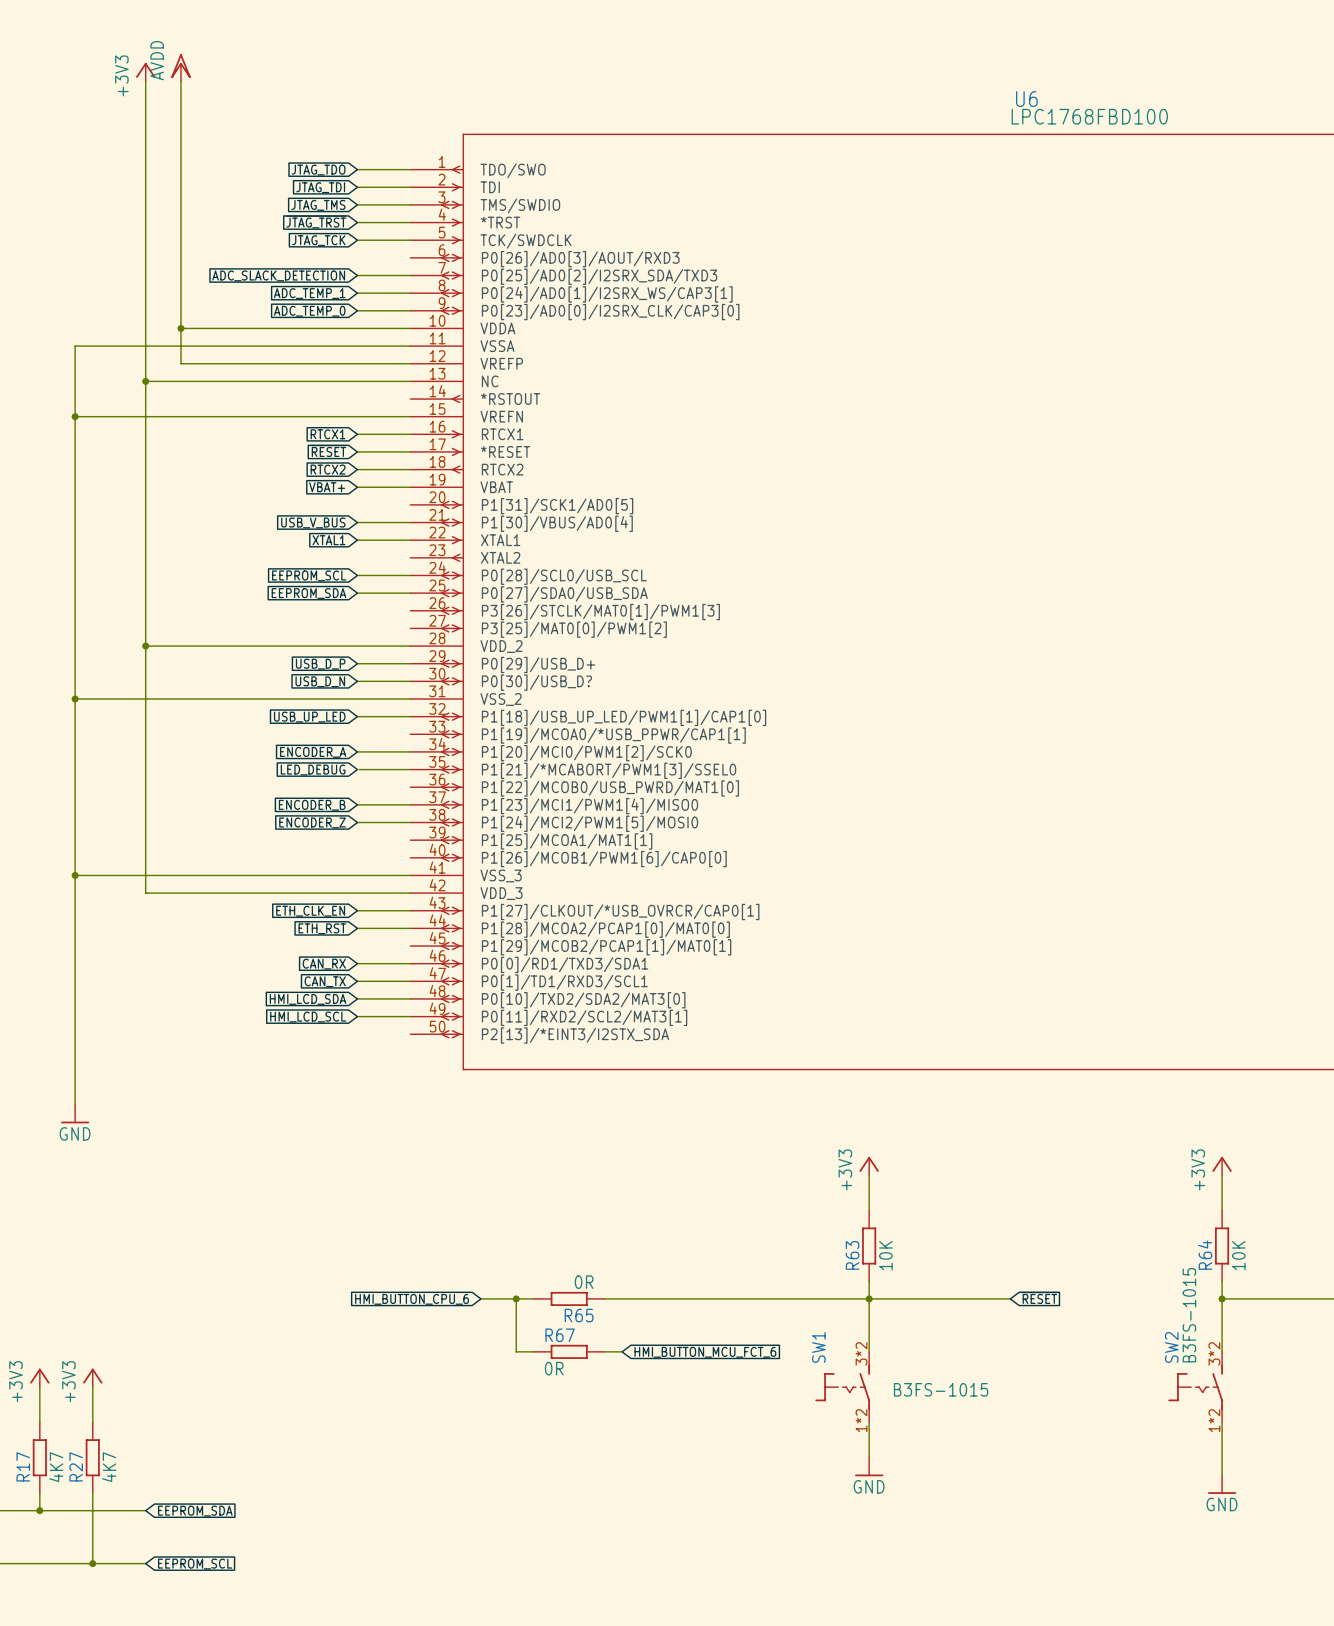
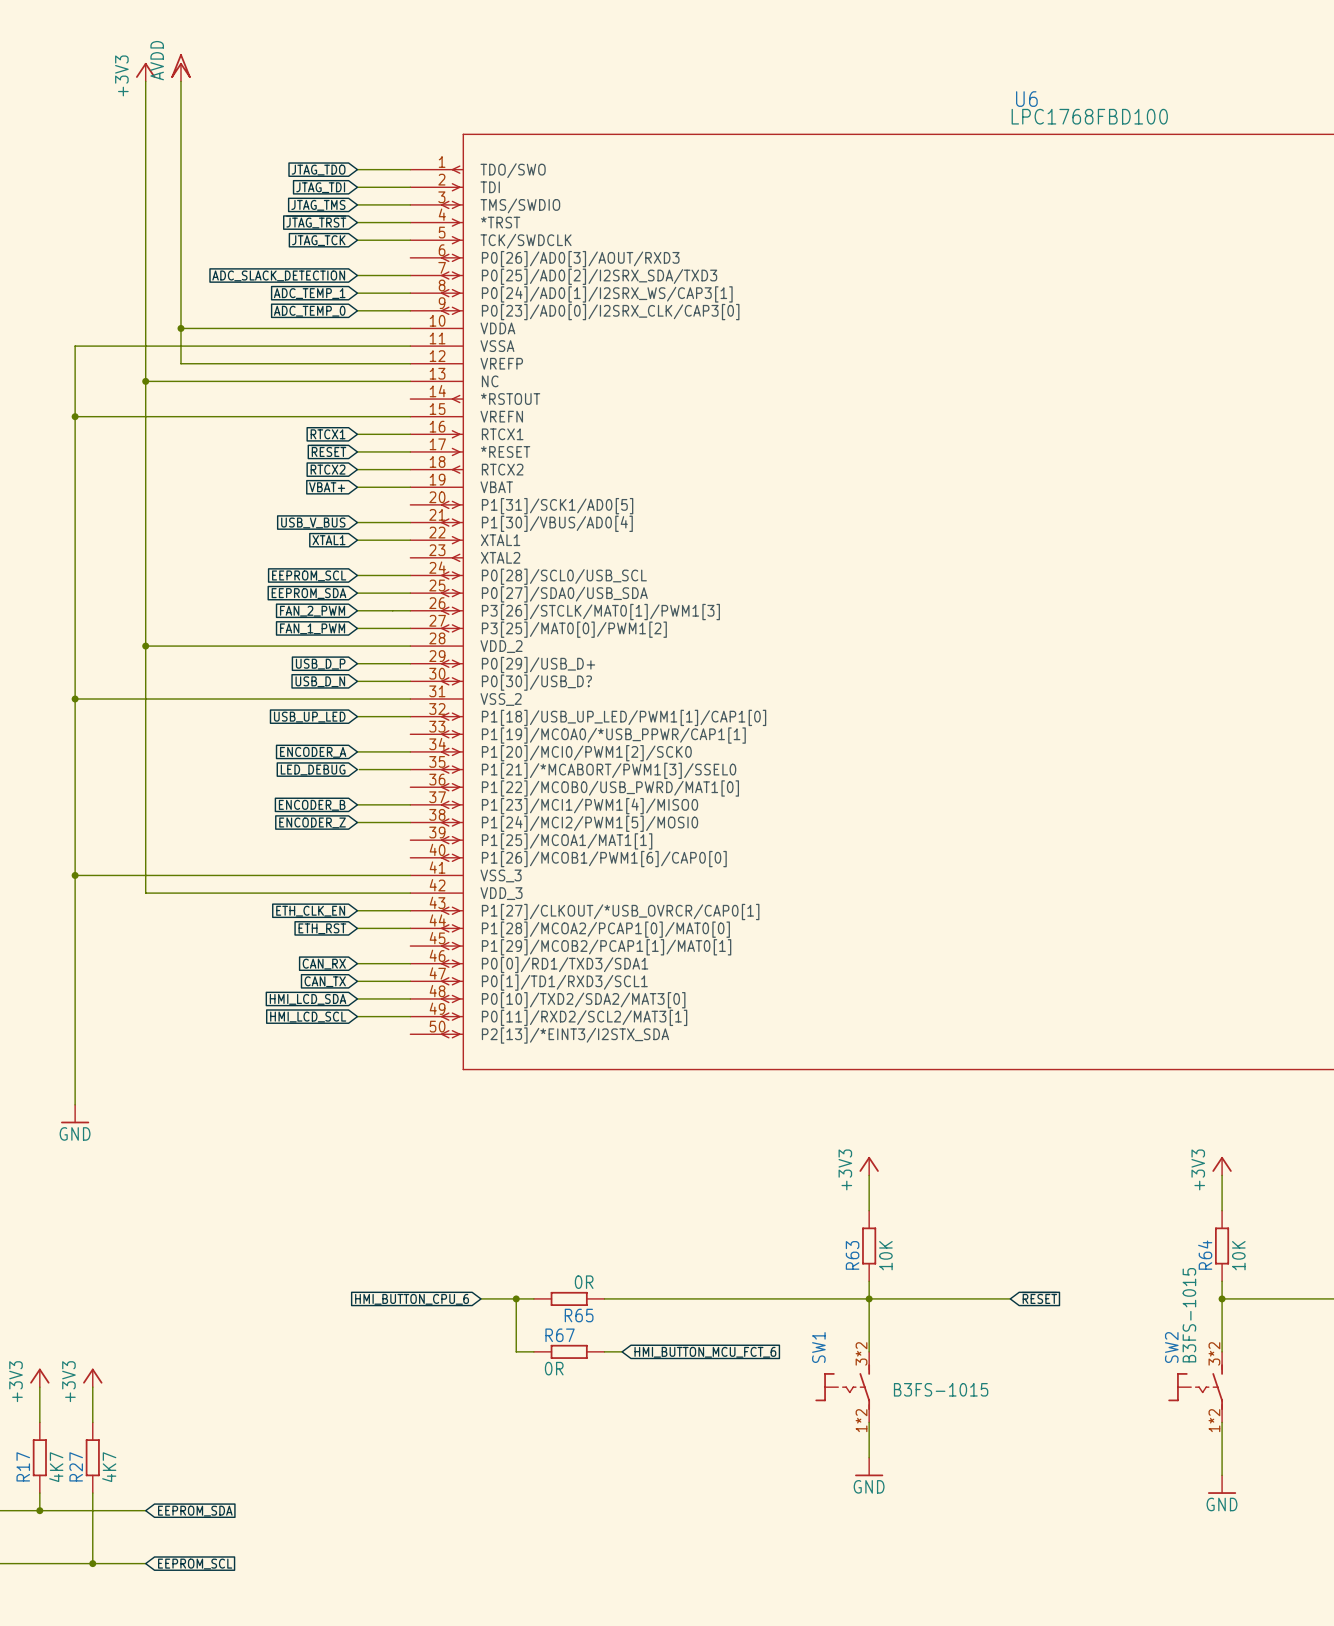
wire: none -> (357, 610) (410, 610)
global label: none -> FAN_2_PWM (312, 611)
global label: none -> FAN_1_PWM (312, 628)
wire: none -> (357, 628) (410, 628)

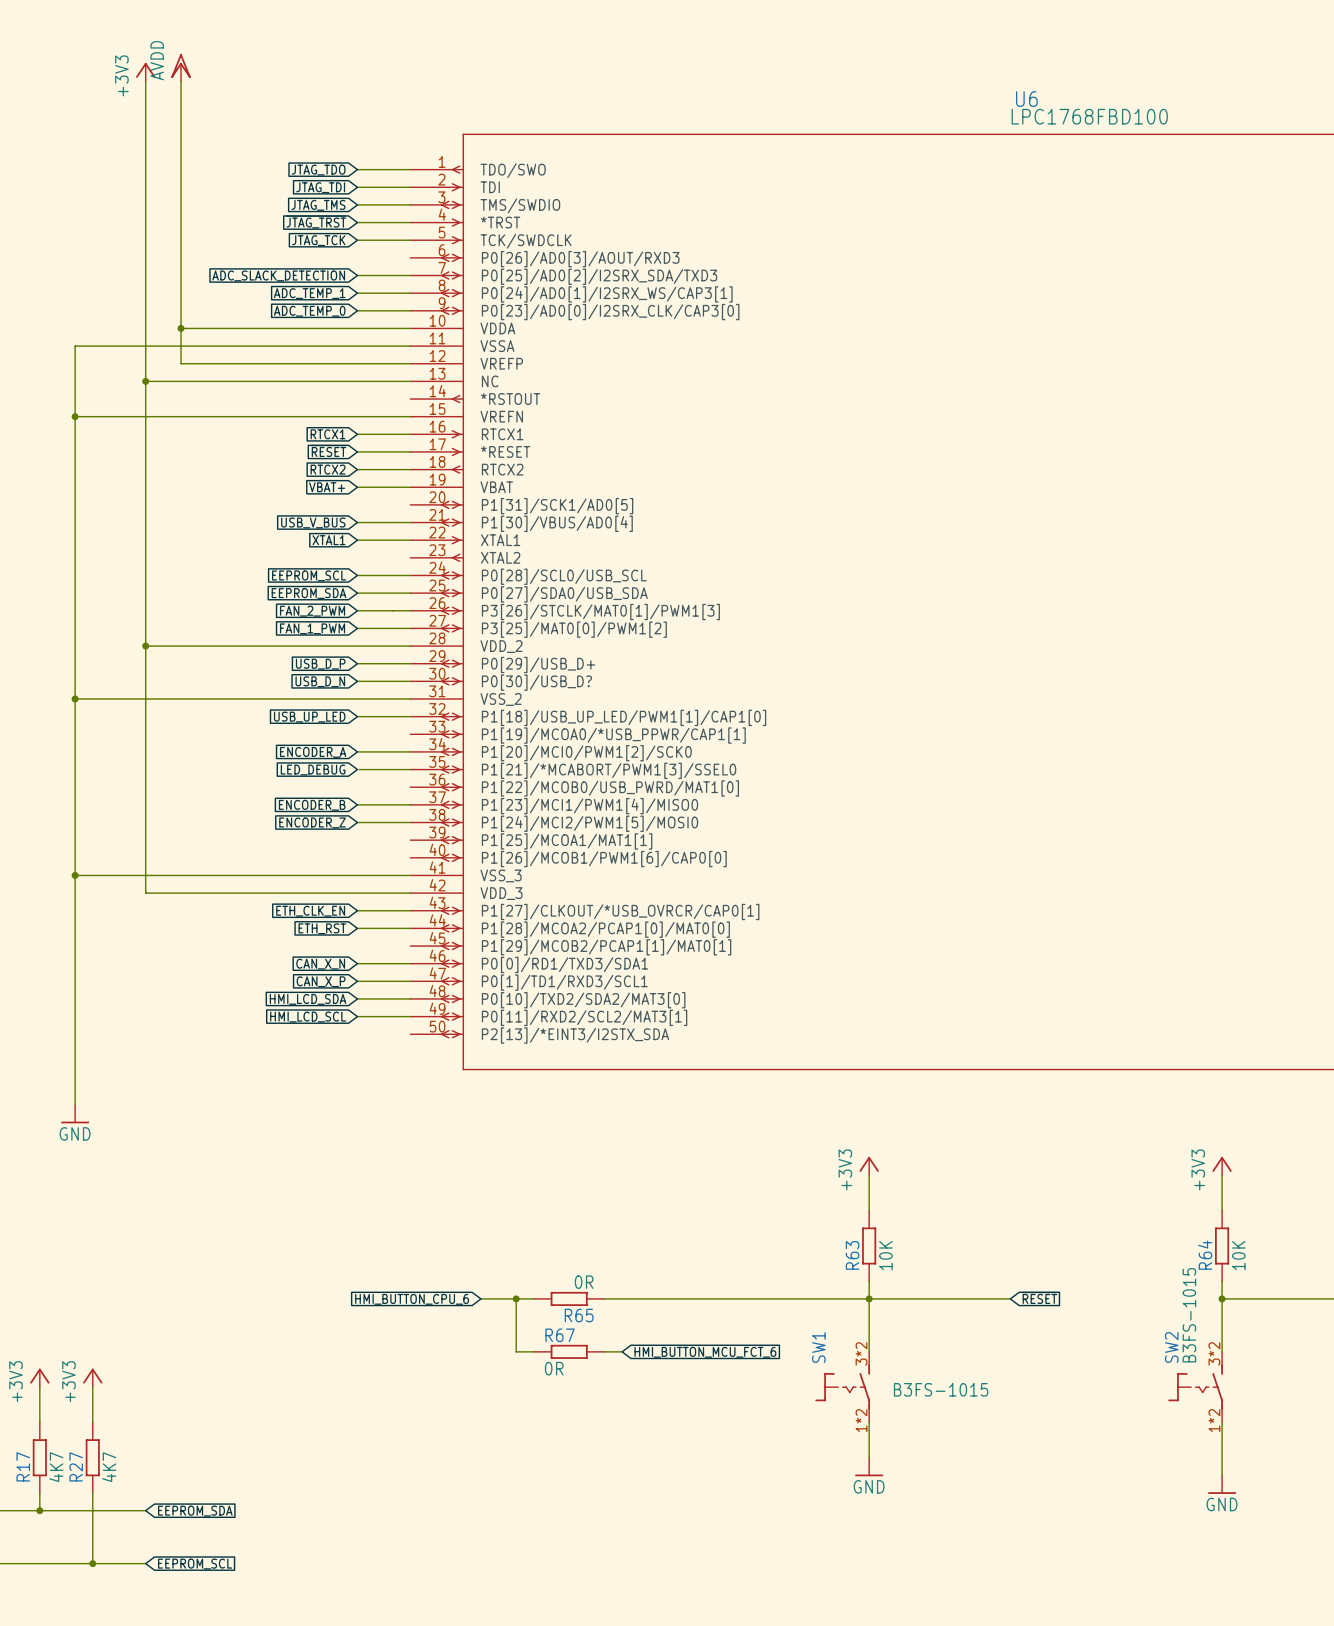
global label: CAN_RX (324, 964) -> CAN_X_N (320, 964)
global label: CAN_TX (325, 981) -> CAN_X_P (321, 981)

